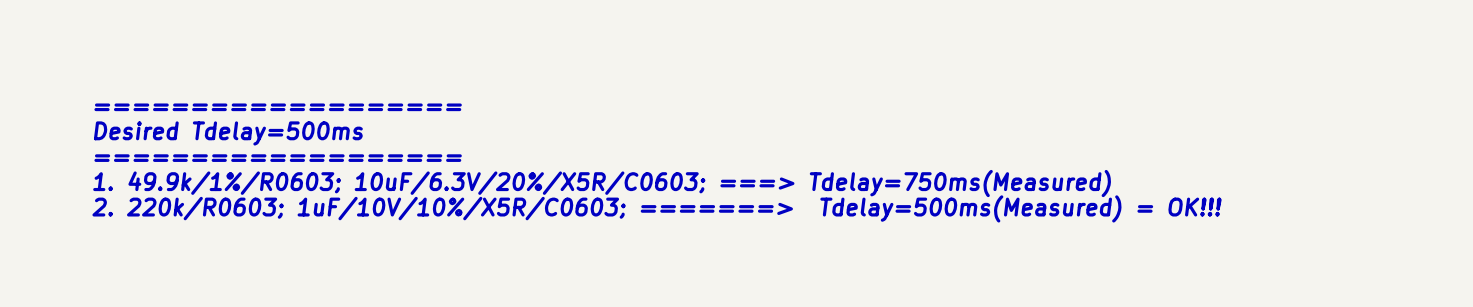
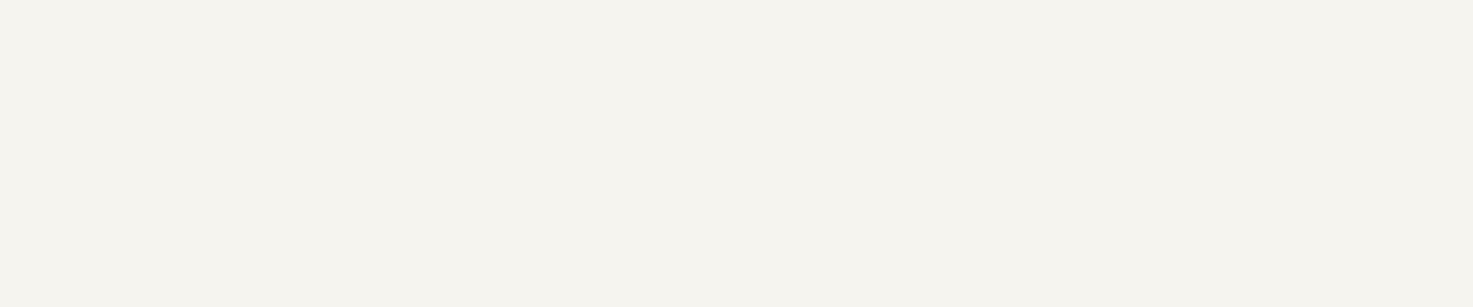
text: =================== (278, 107) -> none
text: Desired Tdelay=500ms (228, 133) -> none
text: =================== (278, 158) -> none
text: 1. 49.9k/1%/R0603; 10uF/6.3V/20%/X5R/C0603; ===> Tdelay=750ms(Measured) (602, 183) -> none
text: 2. 220k/R0603; 1uF/10V/10%/X5R/C0603; =======> Tdelay=500ms(Measured) = OK!!! (657, 208) -> none

